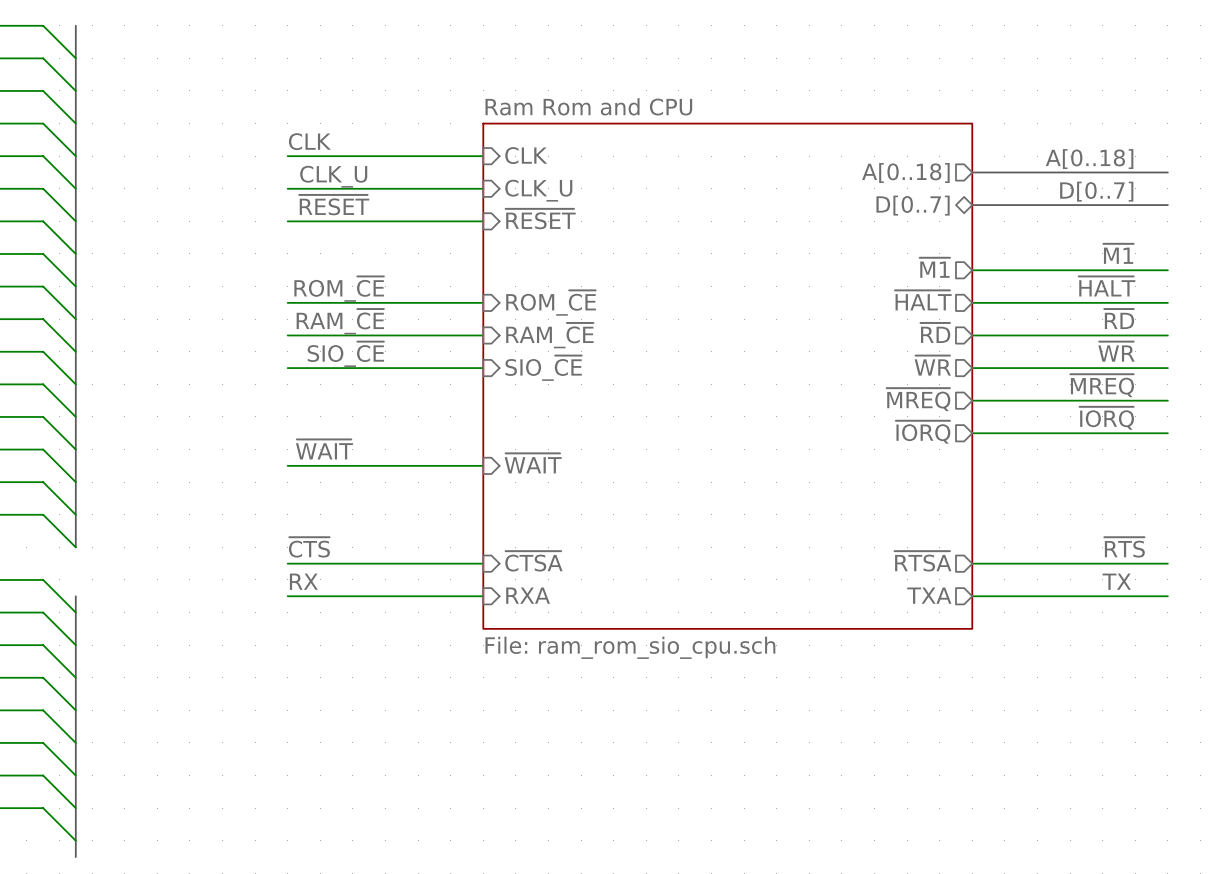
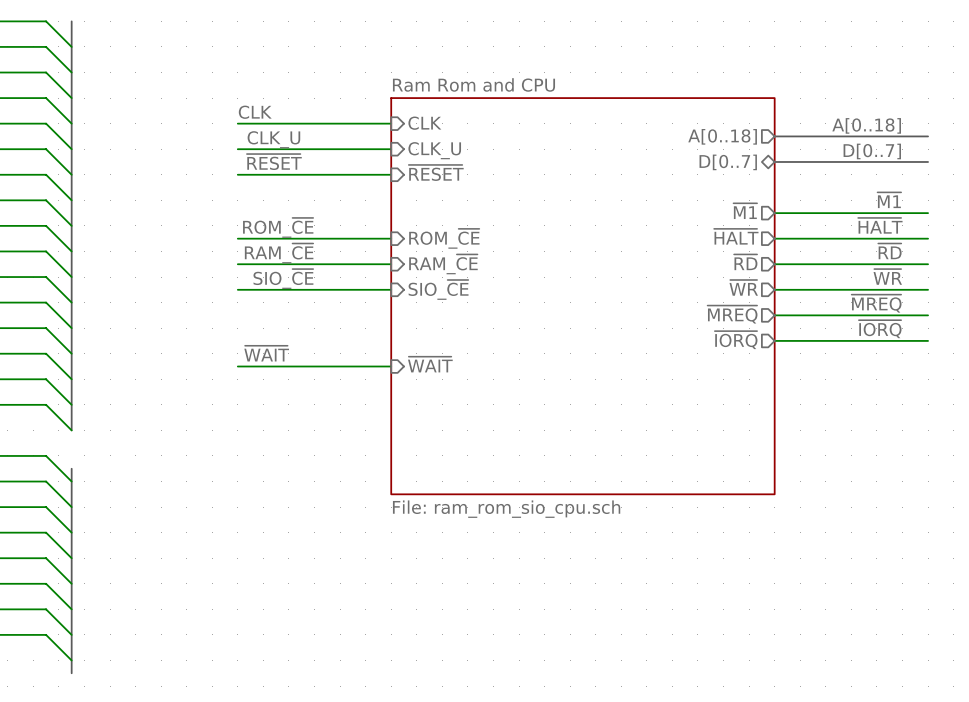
label: ~{CTS} (309, 547) -> none
label: ~{RTS} (1124, 547) -> none
sheet pin: ~{CTSA} (533, 561) -> none
sheet pin: ~{RTSA} (922, 561) -> none
wire: (287, 563) (483, 563) -> none
wire: (972, 563) (1167, 563) -> none
label: RX (303, 581) -> none
label: TX (1116, 581) -> none
sheet pin: RXA (528, 595) -> none
sheet pin: TXA (929, 595) -> none
wire: (287, 596) (483, 596) -> none
wire: (972, 596) (1167, 596) -> none

